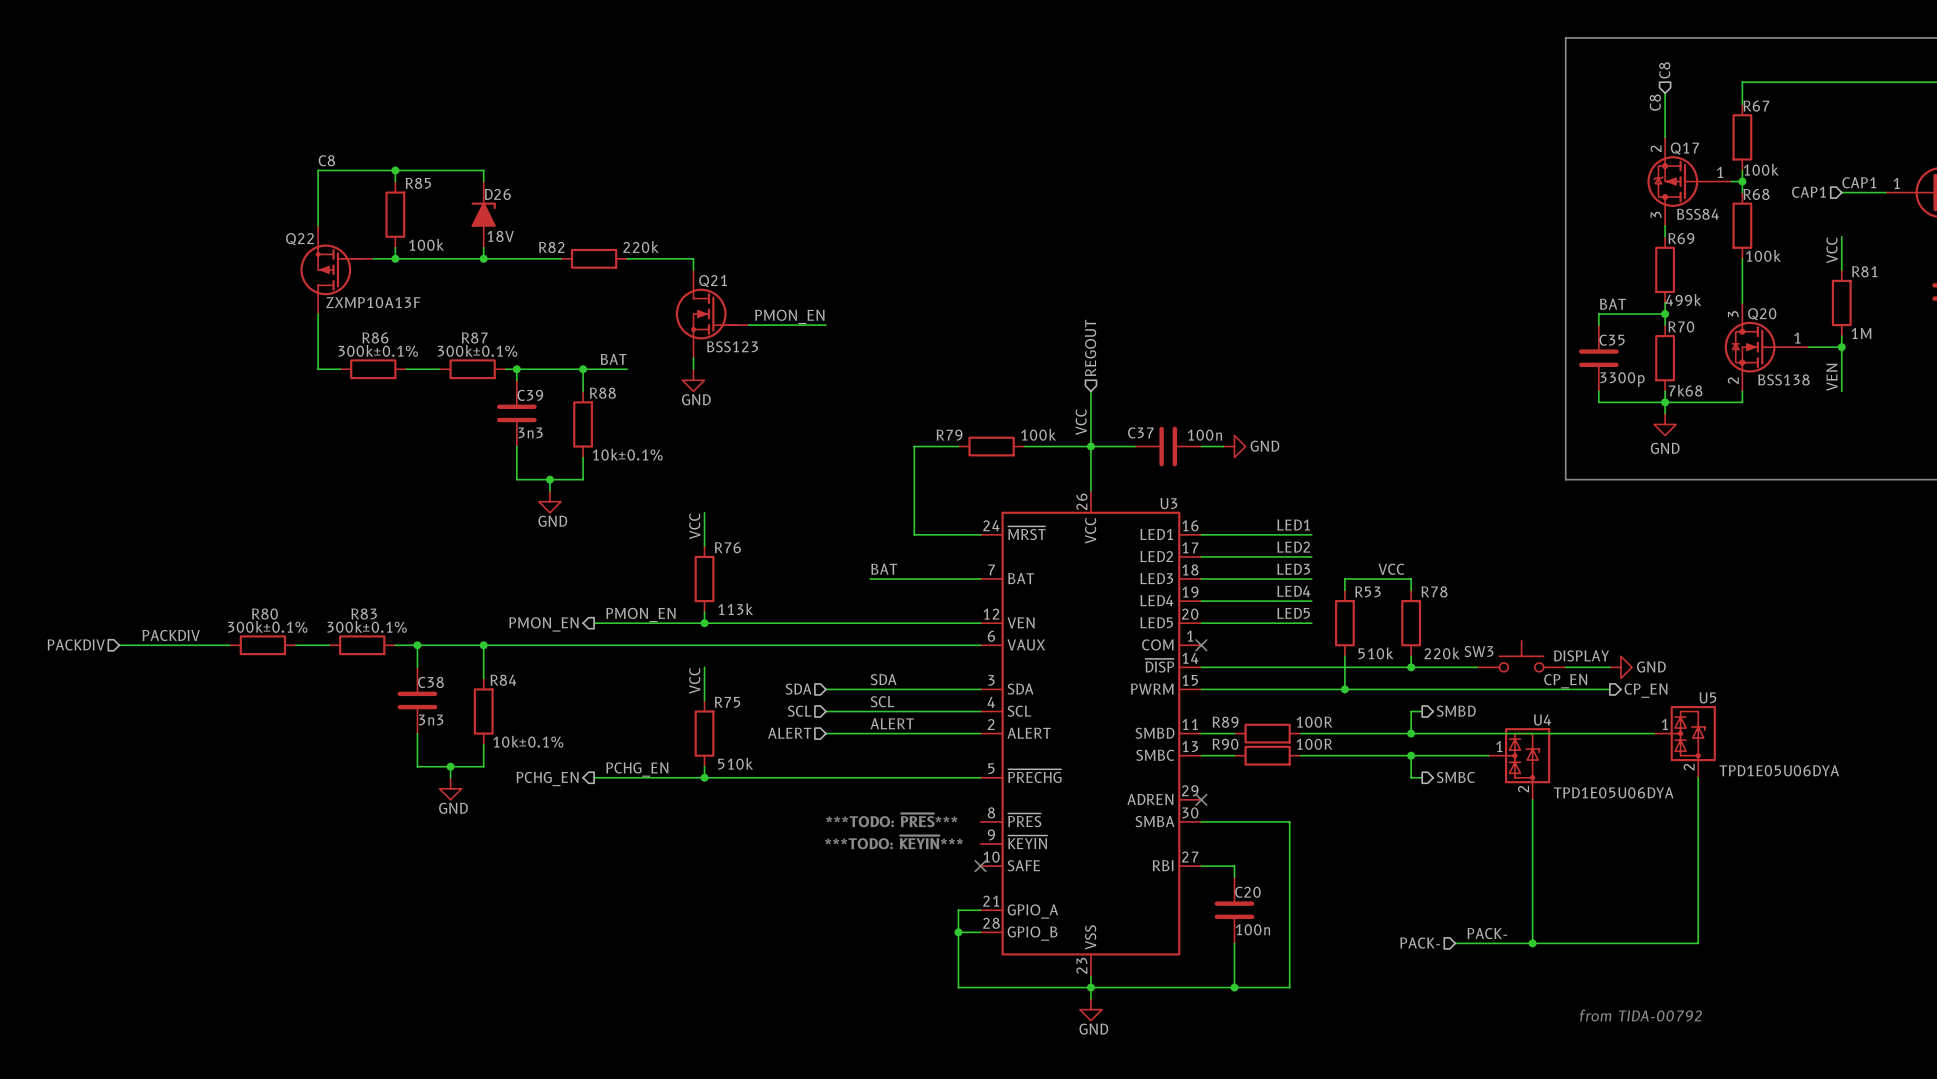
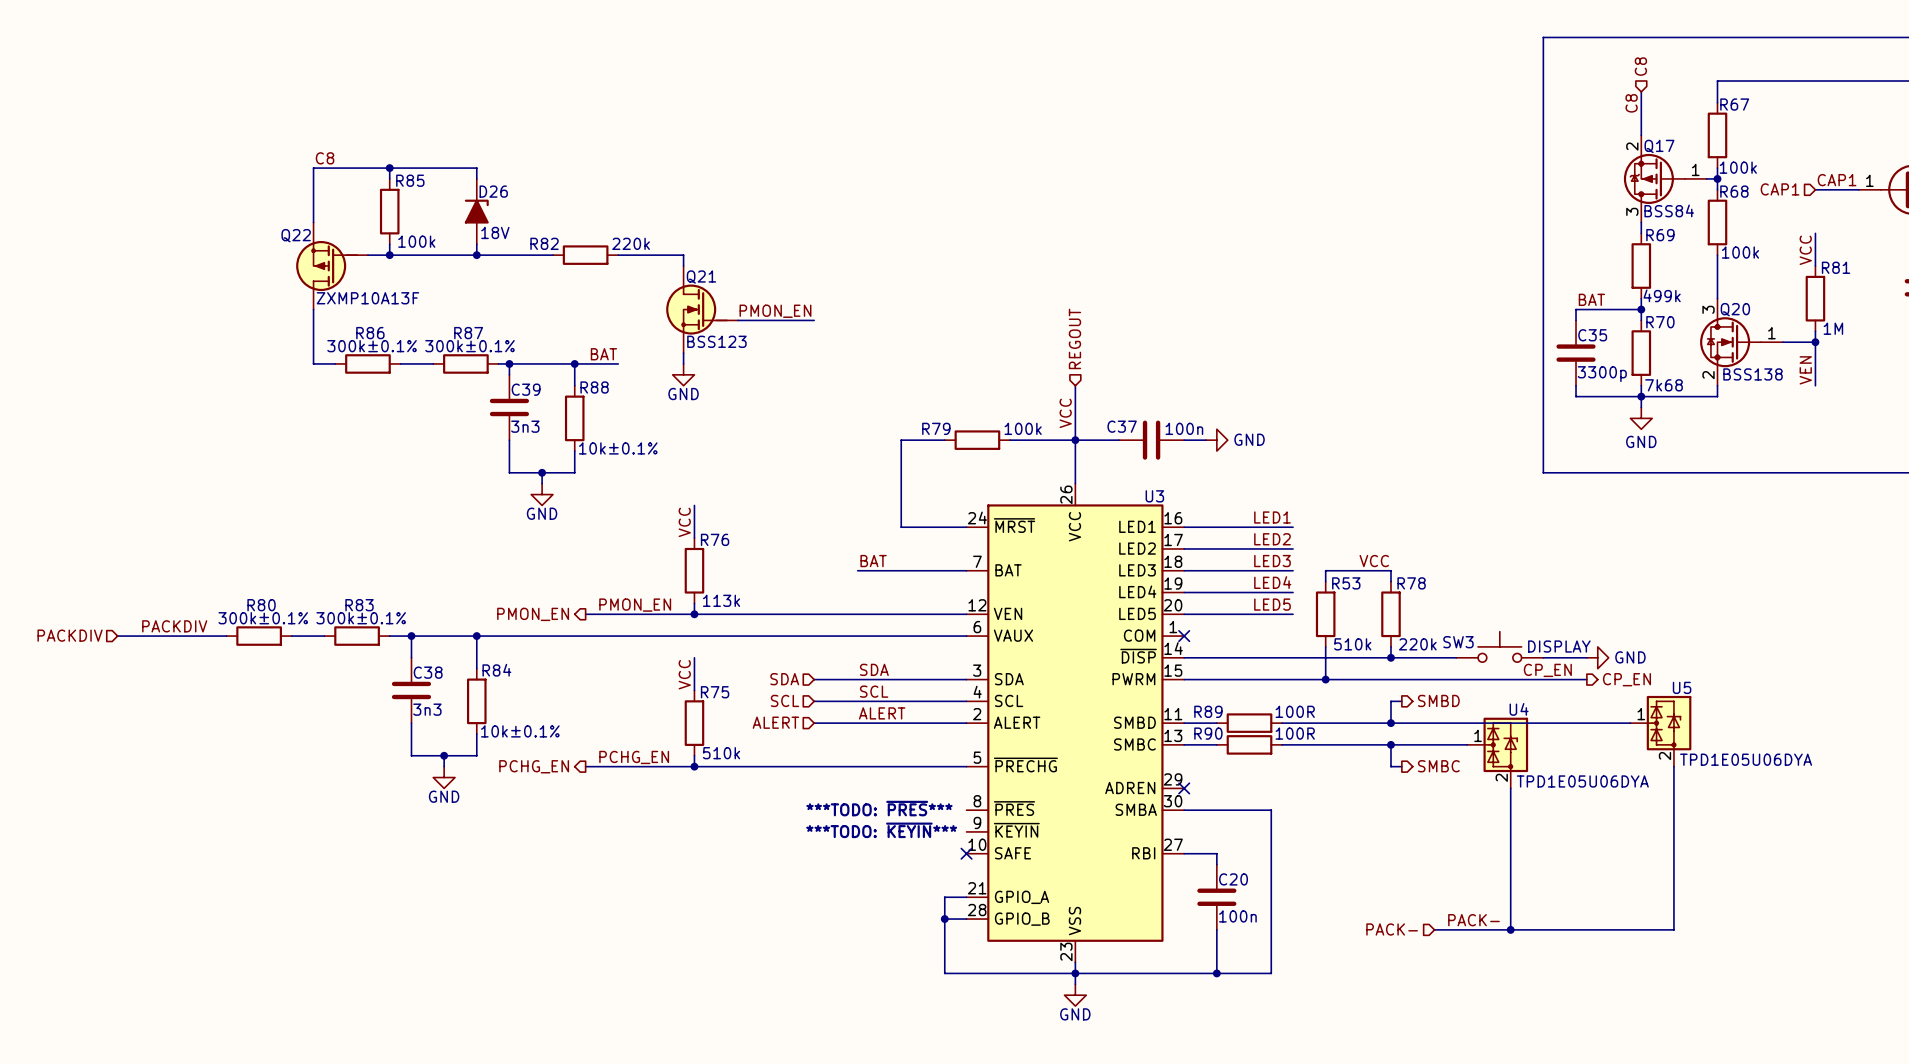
text: from TIDA-00792 (1640, 1015) -> none

